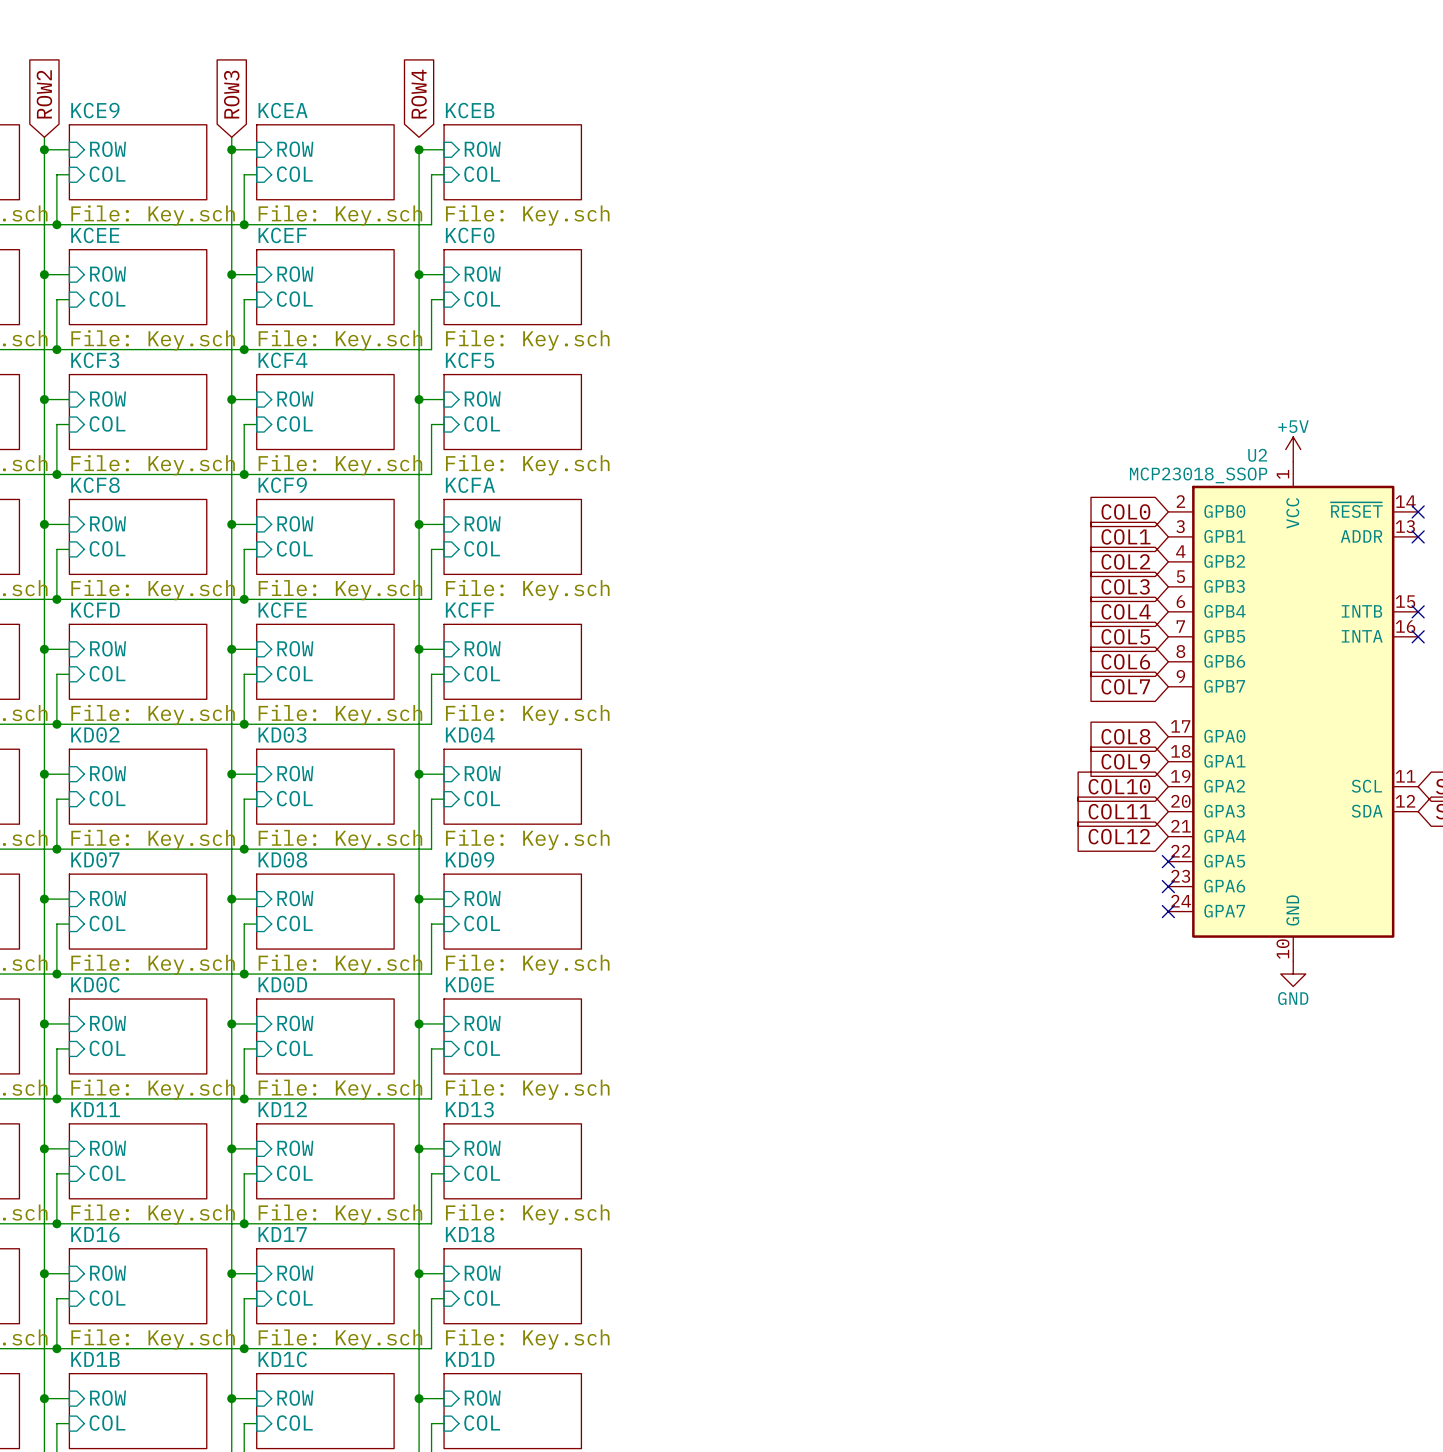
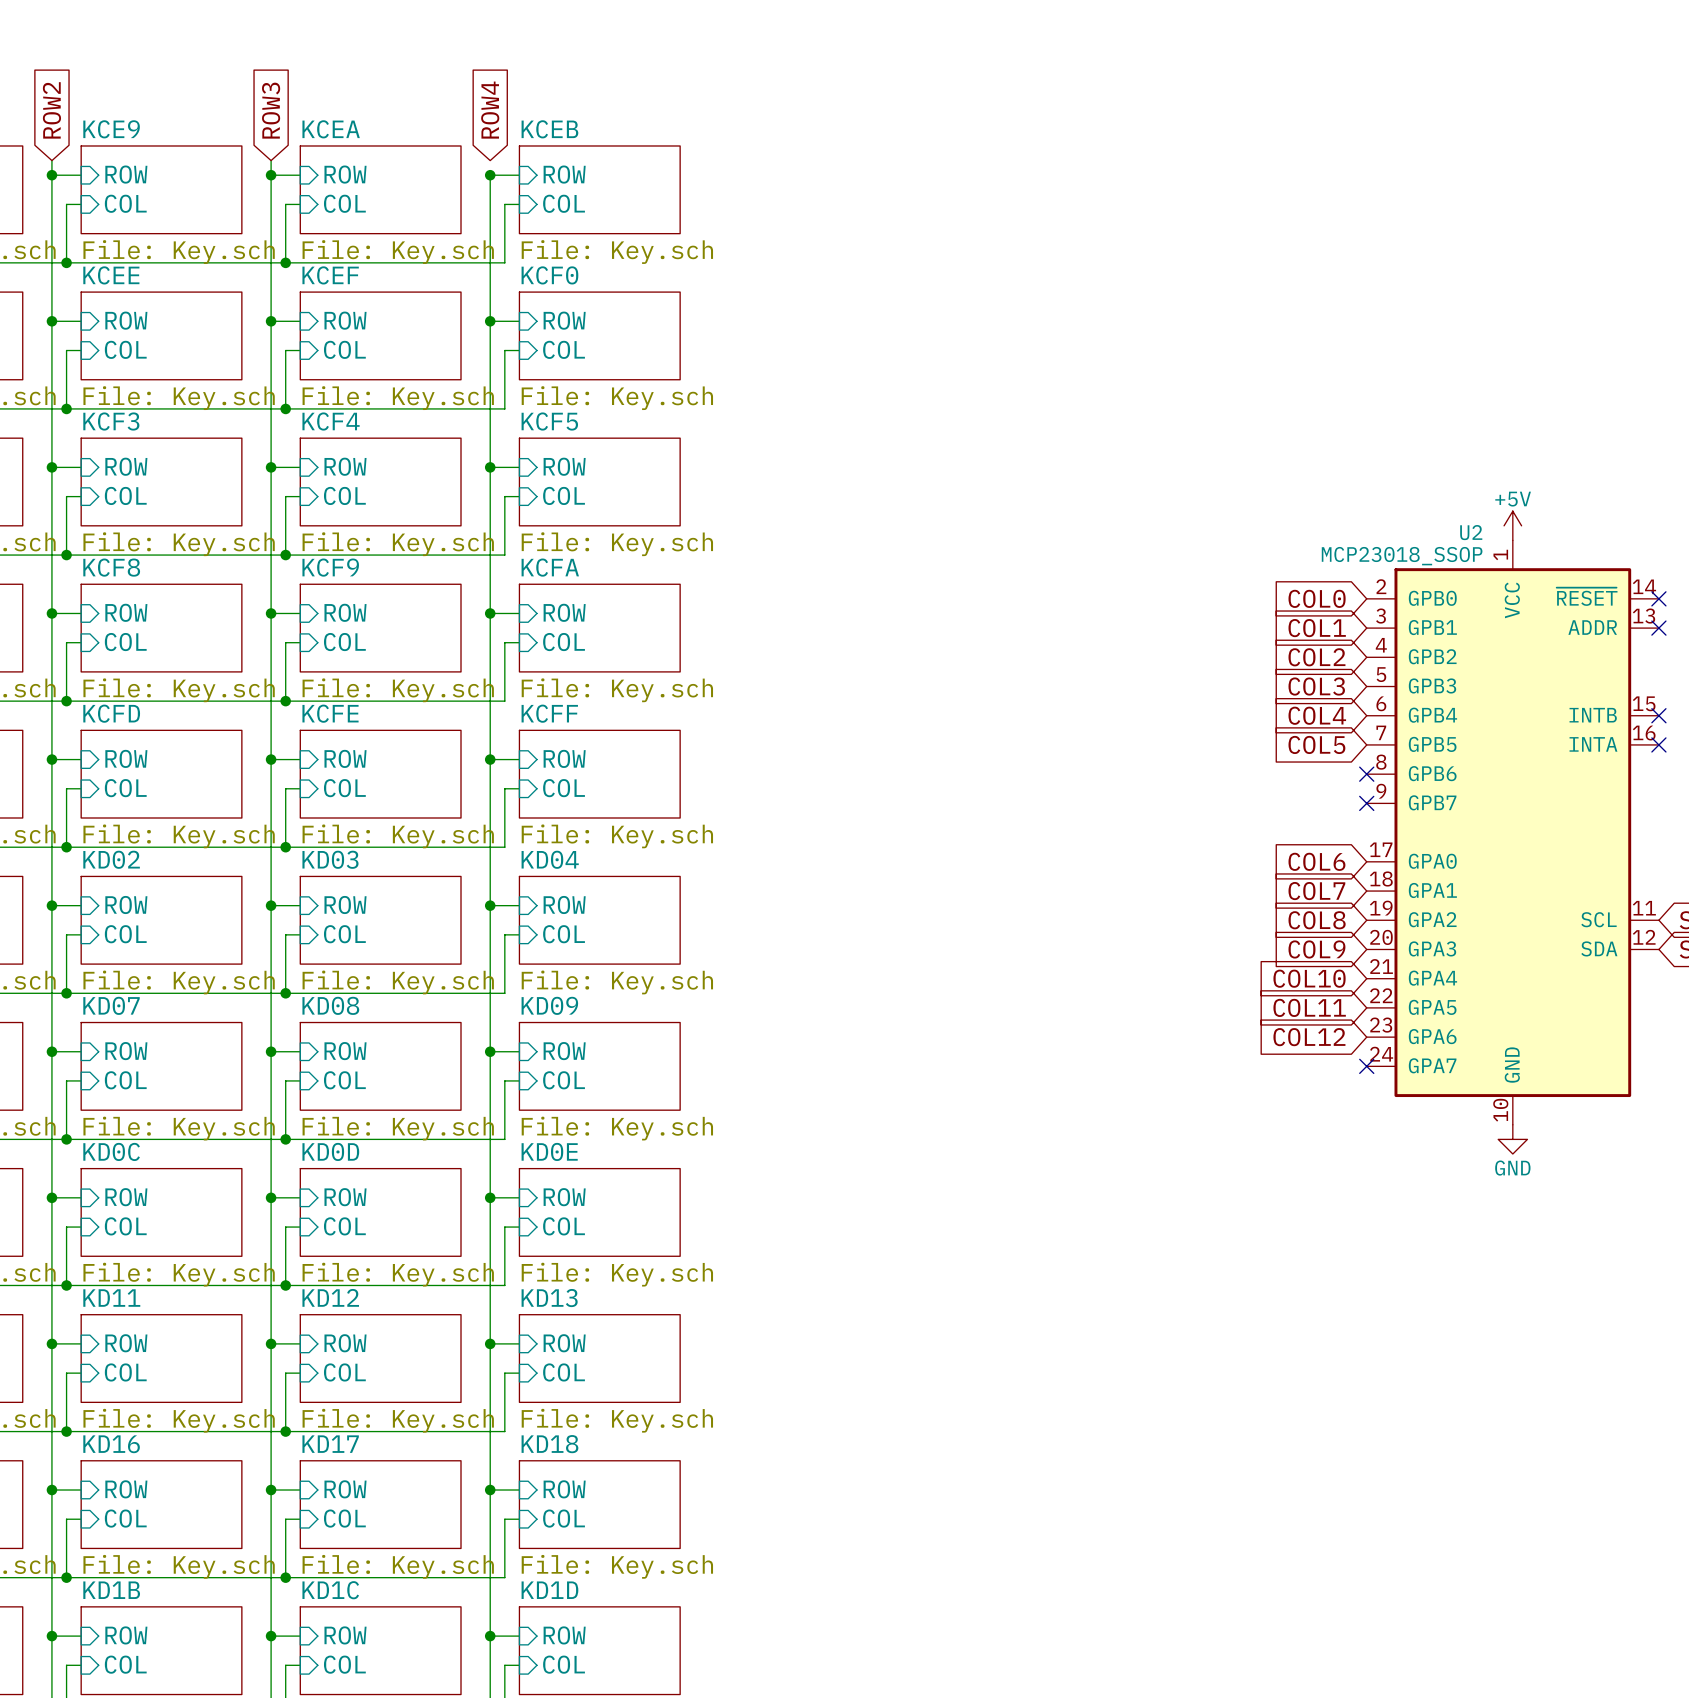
global label: COL6 (1125, 661) -> none
no-connect mark: none -> (1366, 774)
global label: COL7 (1125, 686) -> none
no-connect mark: none -> (1366, 803)
global label: COL8 (1125, 736) -> COL6 (1316, 861)
global label: COL9 (1125, 761) -> COL7 (1316, 891)
global label: COL10 (1119, 786) -> COL8 (1317, 920)
global label: COL11 (1119, 811) -> COL9 (1316, 949)
global label: COL12 (1119, 836) -> COL10 (1309, 978)
global label: none -> COL11 (1309, 1007)
no-connect mark: (1168, 861) -> none
global label: none -> COL12 (1309, 1037)
no-connect mark: (1168, 886) -> none

